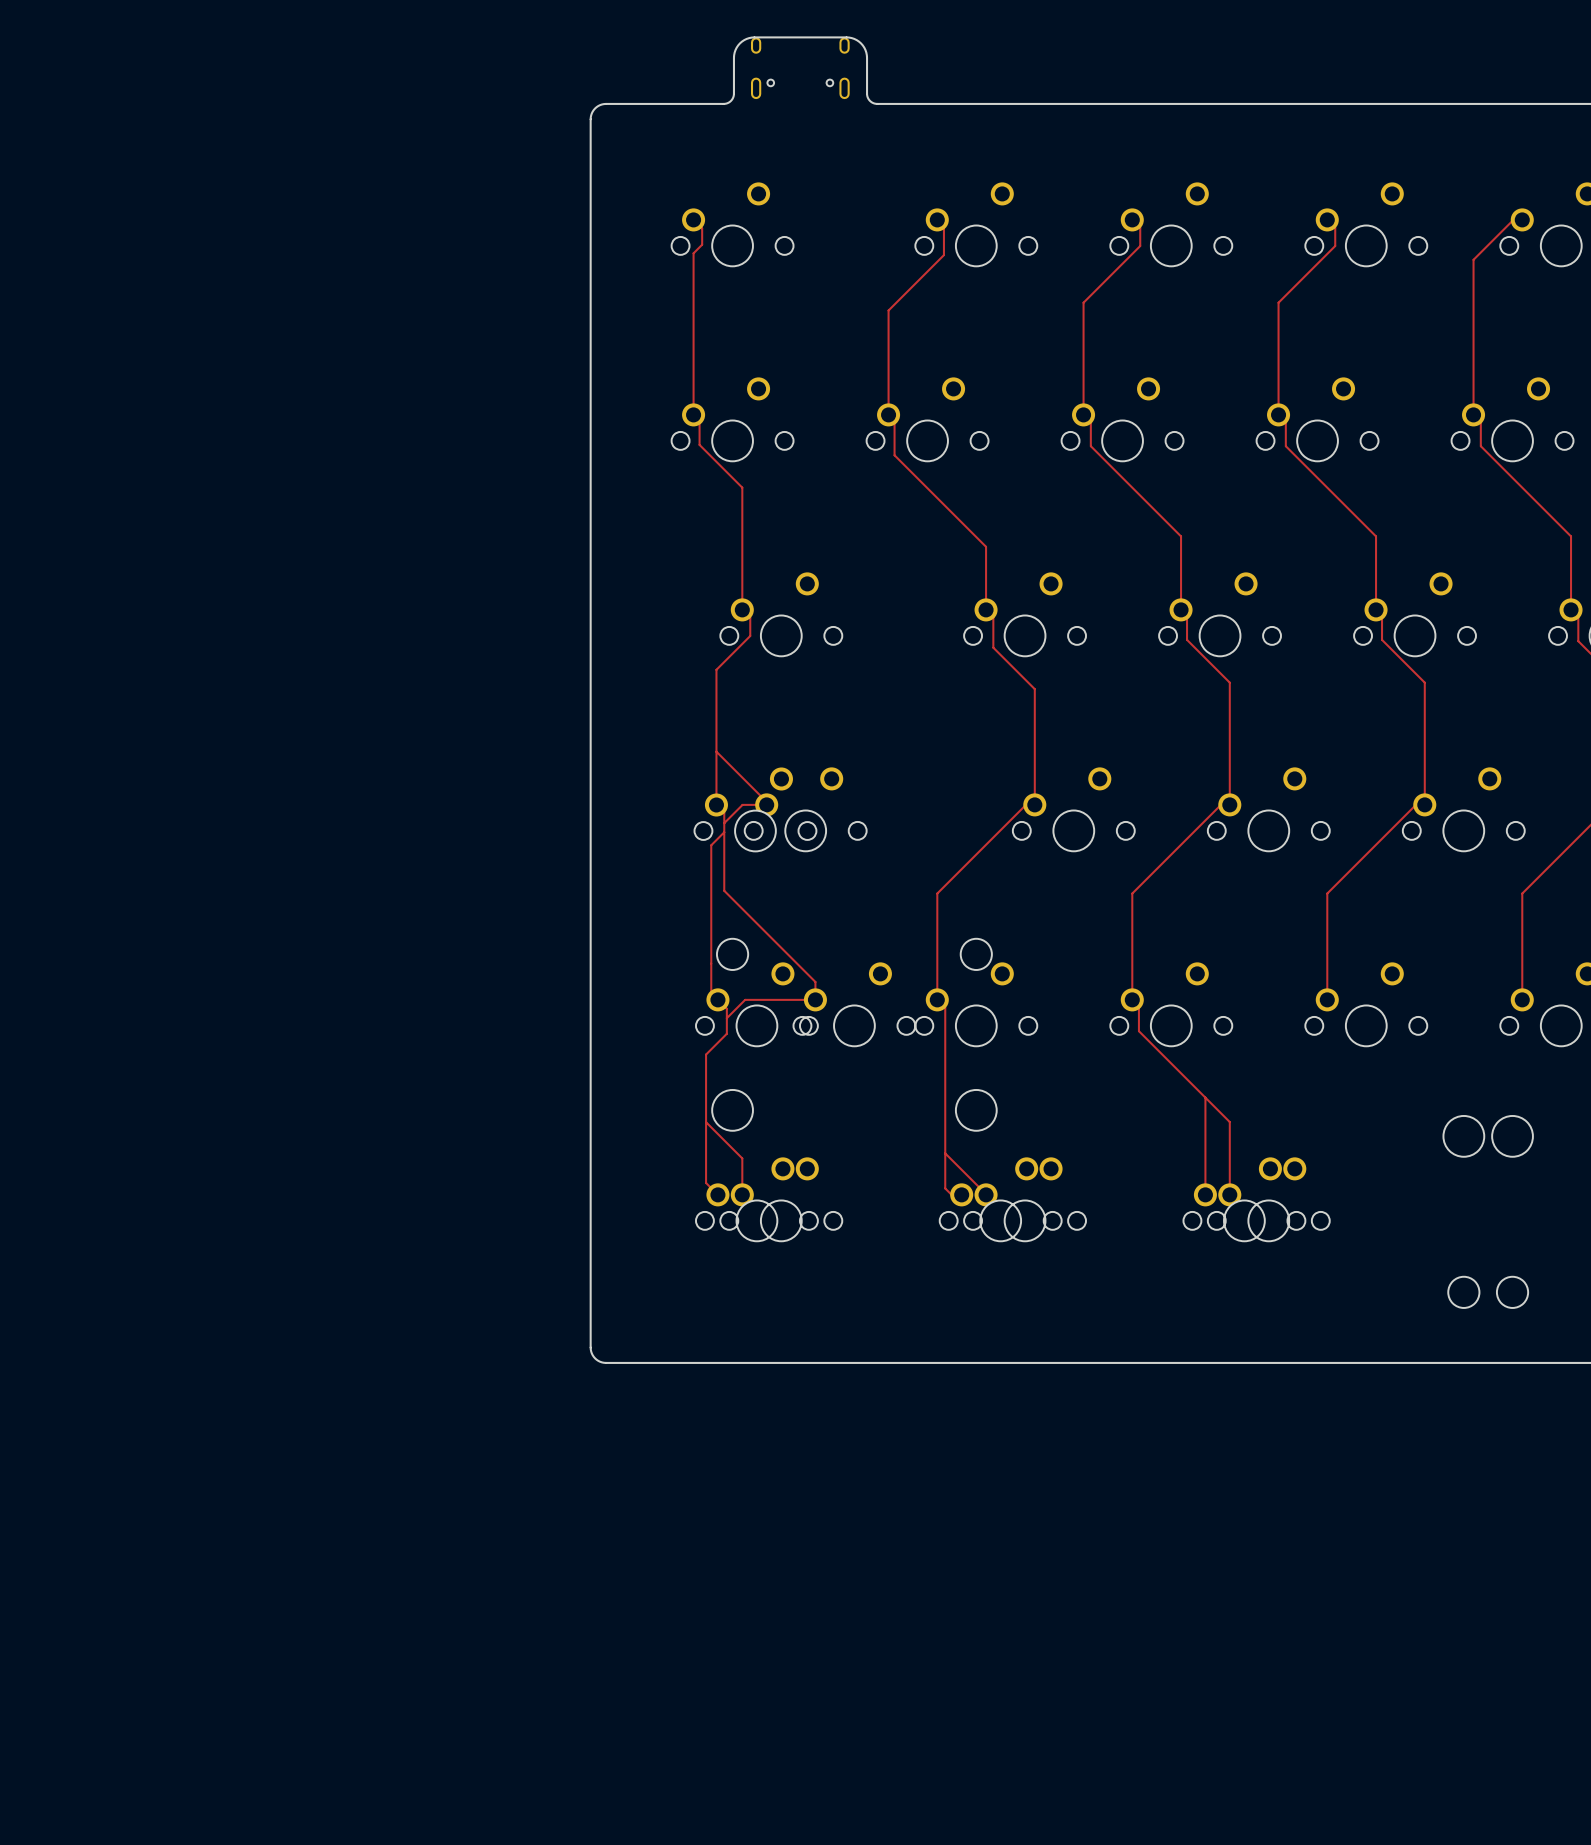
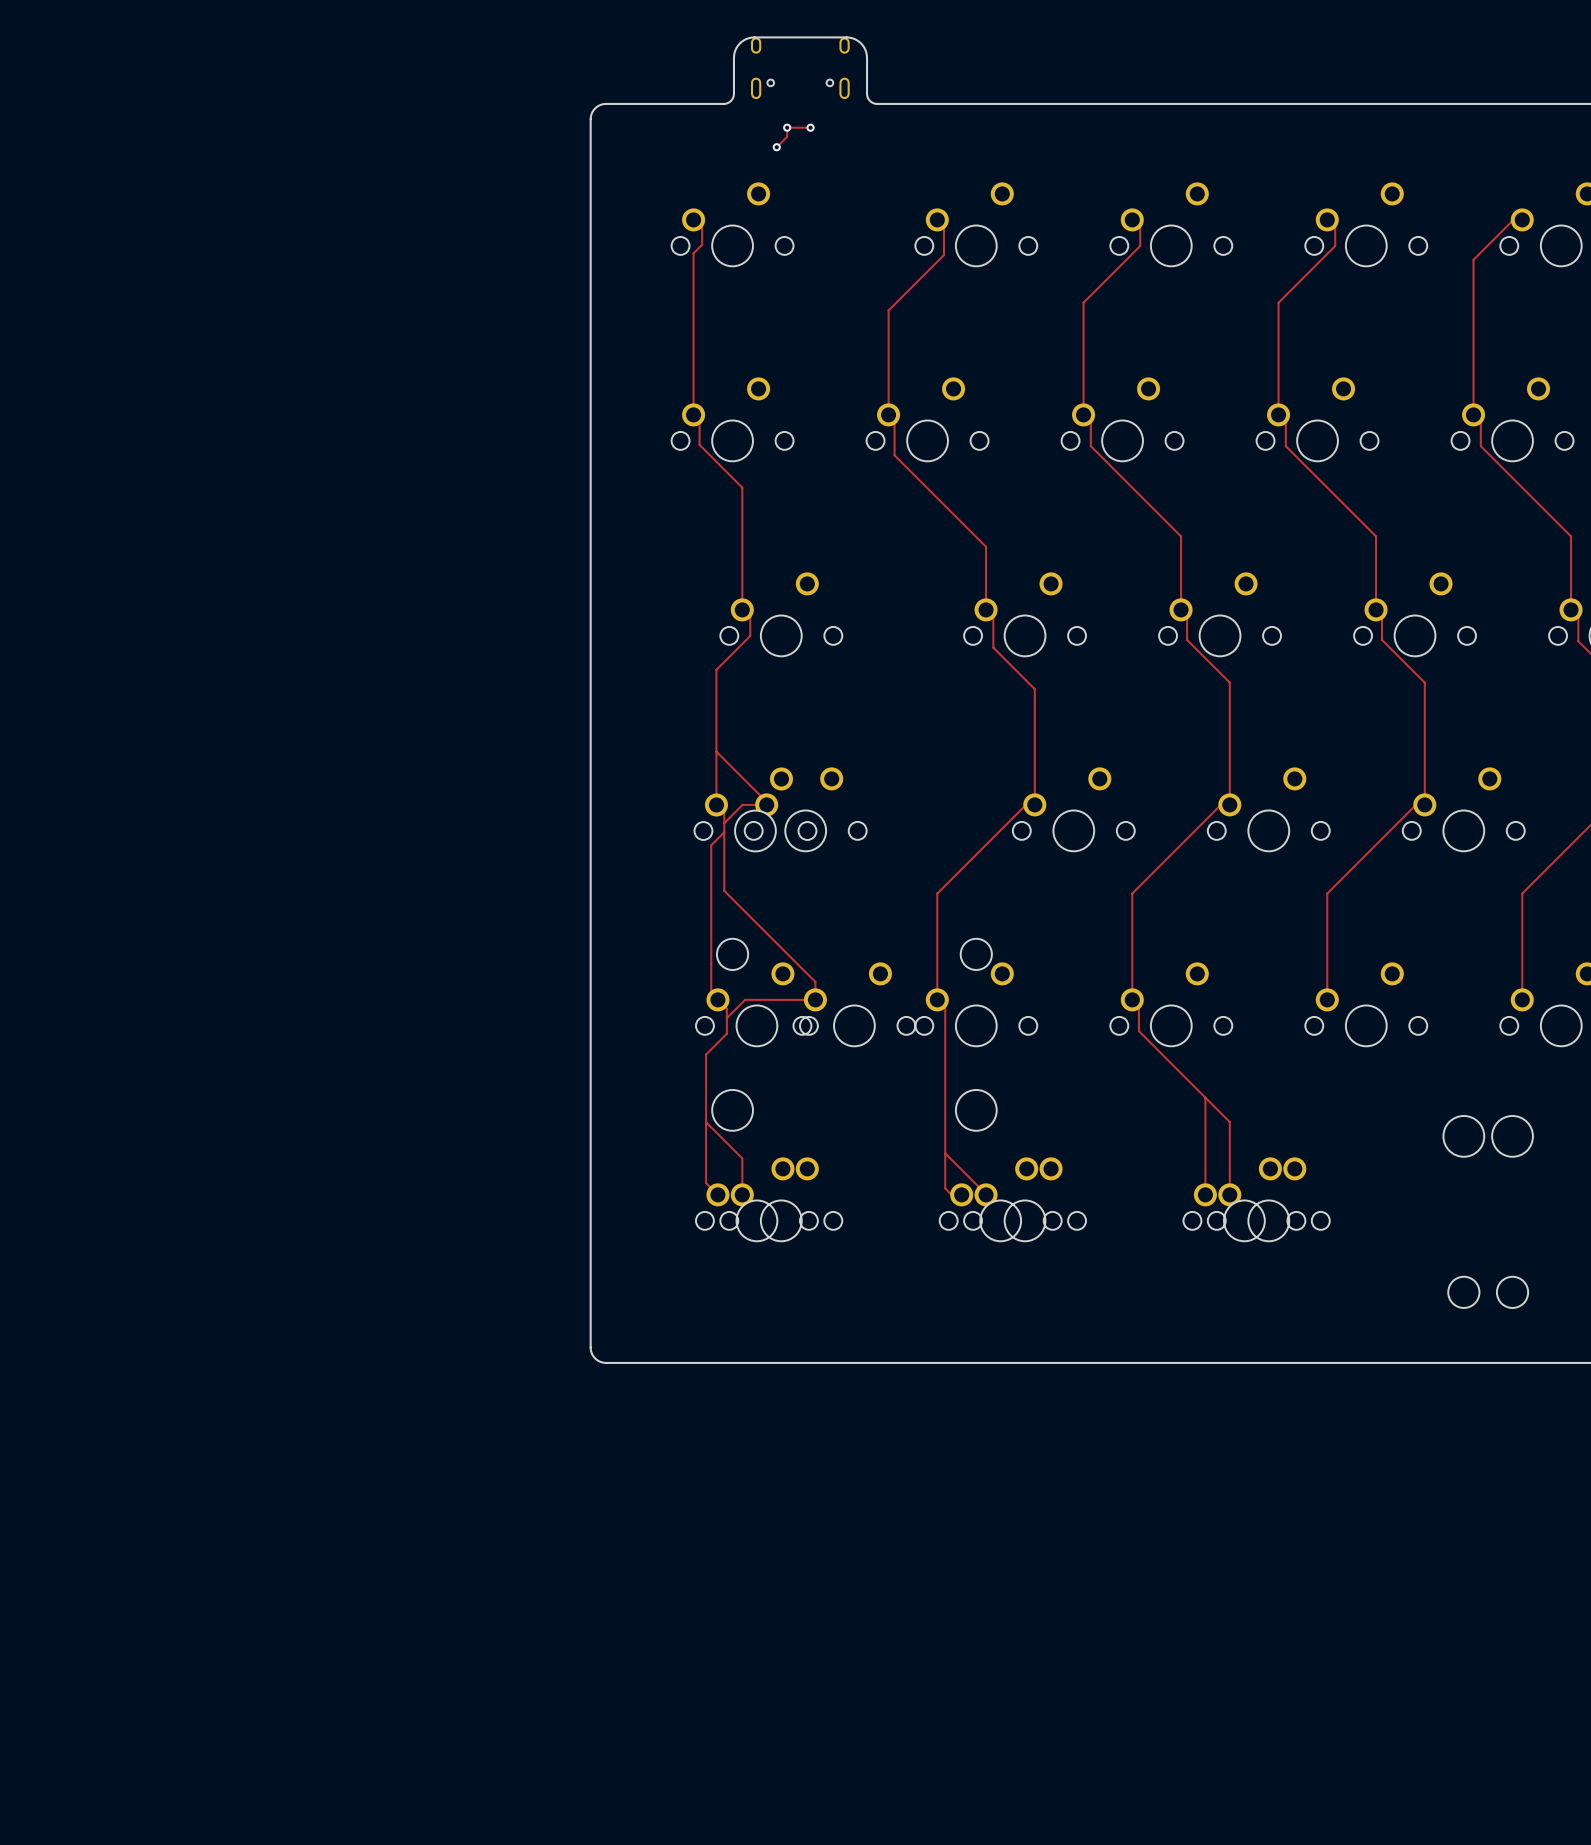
via: none -> (787, 127)
track: none -> (810, 127) (787, 127) (787, 136) (776, 147)
via: none -> (810, 127)
via: none -> (776, 147)

